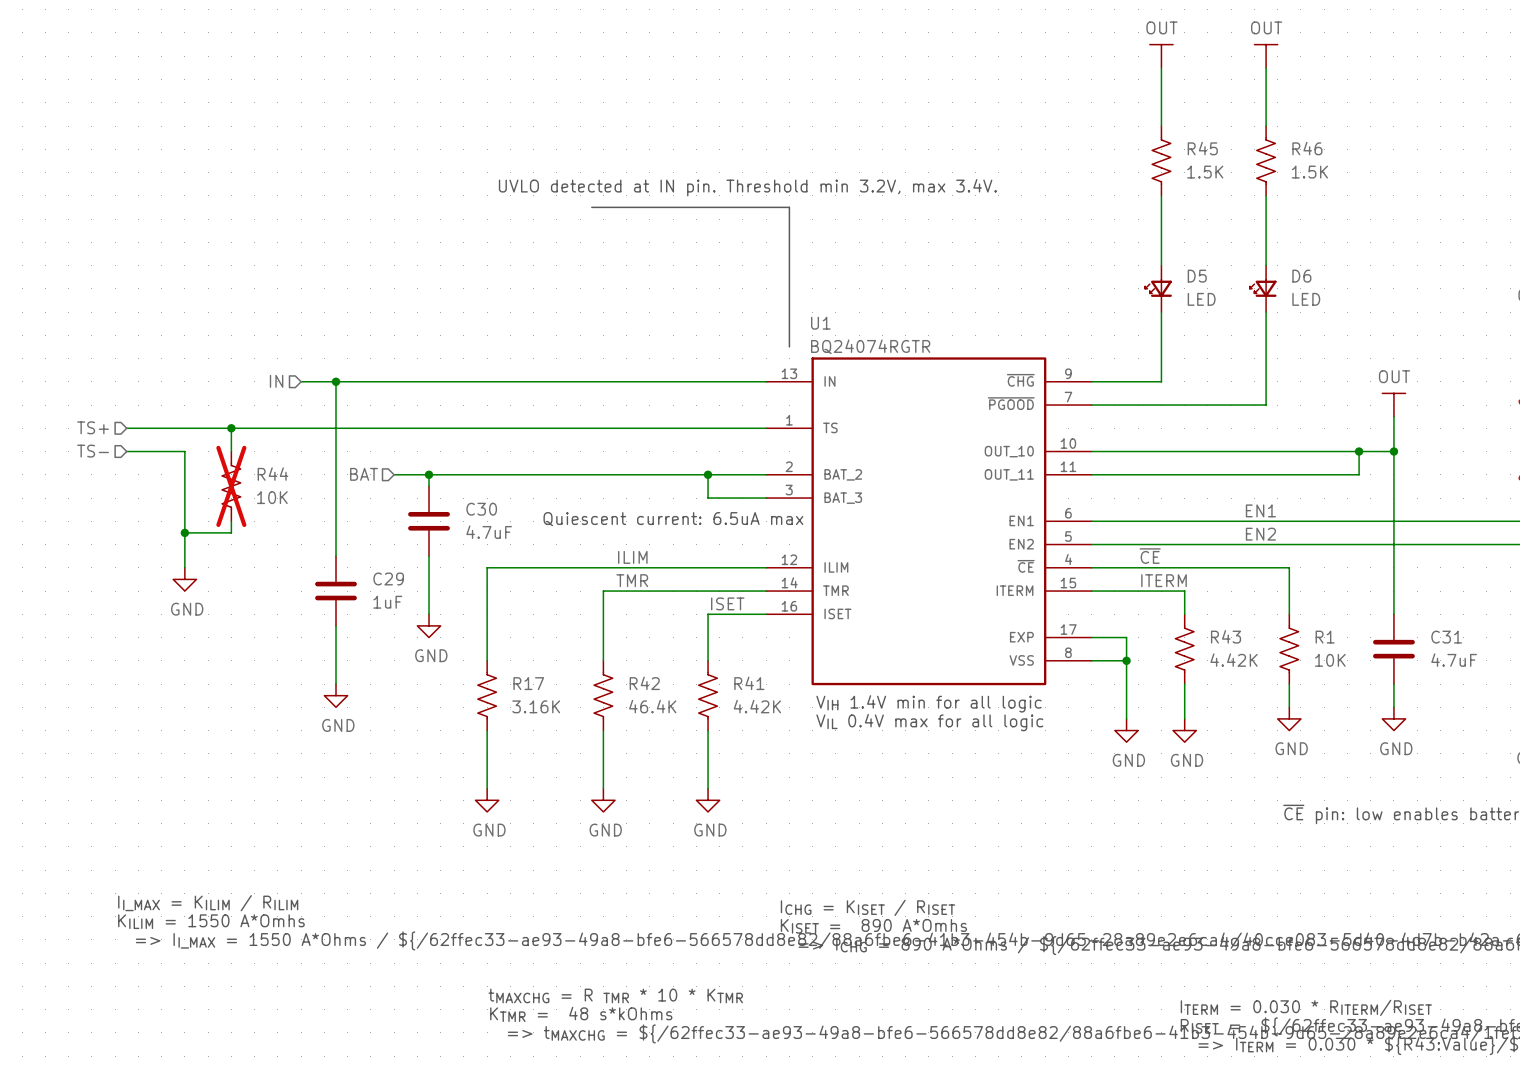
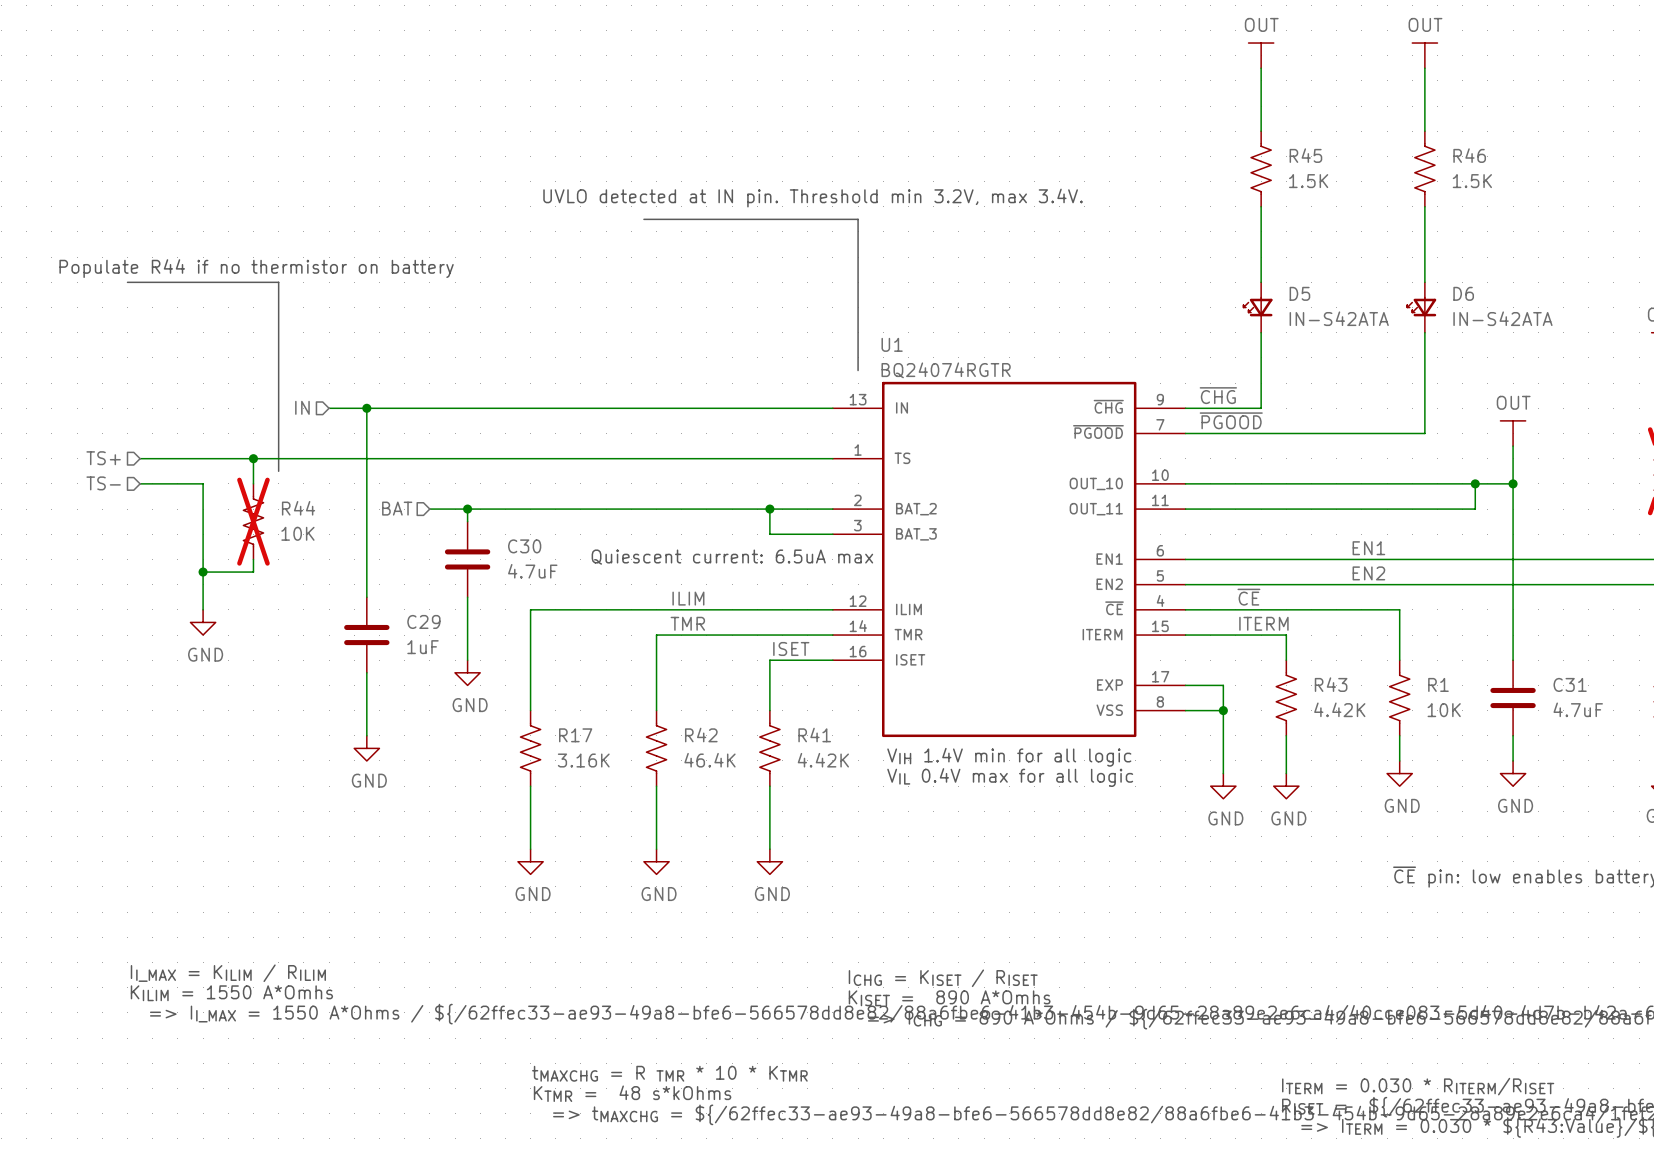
power symbol position: OUT (1266, 56) -> OUT (1424, 55)
wire: (1266, 67) (1266, 126) -> (1424, 68) (1424, 131)
R46 position: (1266, 160) -> (1424, 168)
wire: (1266, 195) (1266, 265) -> (1424, 206) (1424, 282)
text: none -> Populate R44 if no thermistor on battery (256, 268)
line: none -> (127, 282) (278, 282) (278, 471)
D6 position: (1263, 288) -> (1421, 307)
D5 value: LED (1201, 299) -> IN-S42ATA (1339, 318)
D6 value: LED (1306, 299) -> IN-S42ATA (1502, 318)
wire: (1266, 312) (1266, 405) -> (1424, 332) (1424, 433) (1374, 433)
label: none -> ~{CHG} (1218, 395)
label: none -> ~{PGOOD} (1231, 420)

